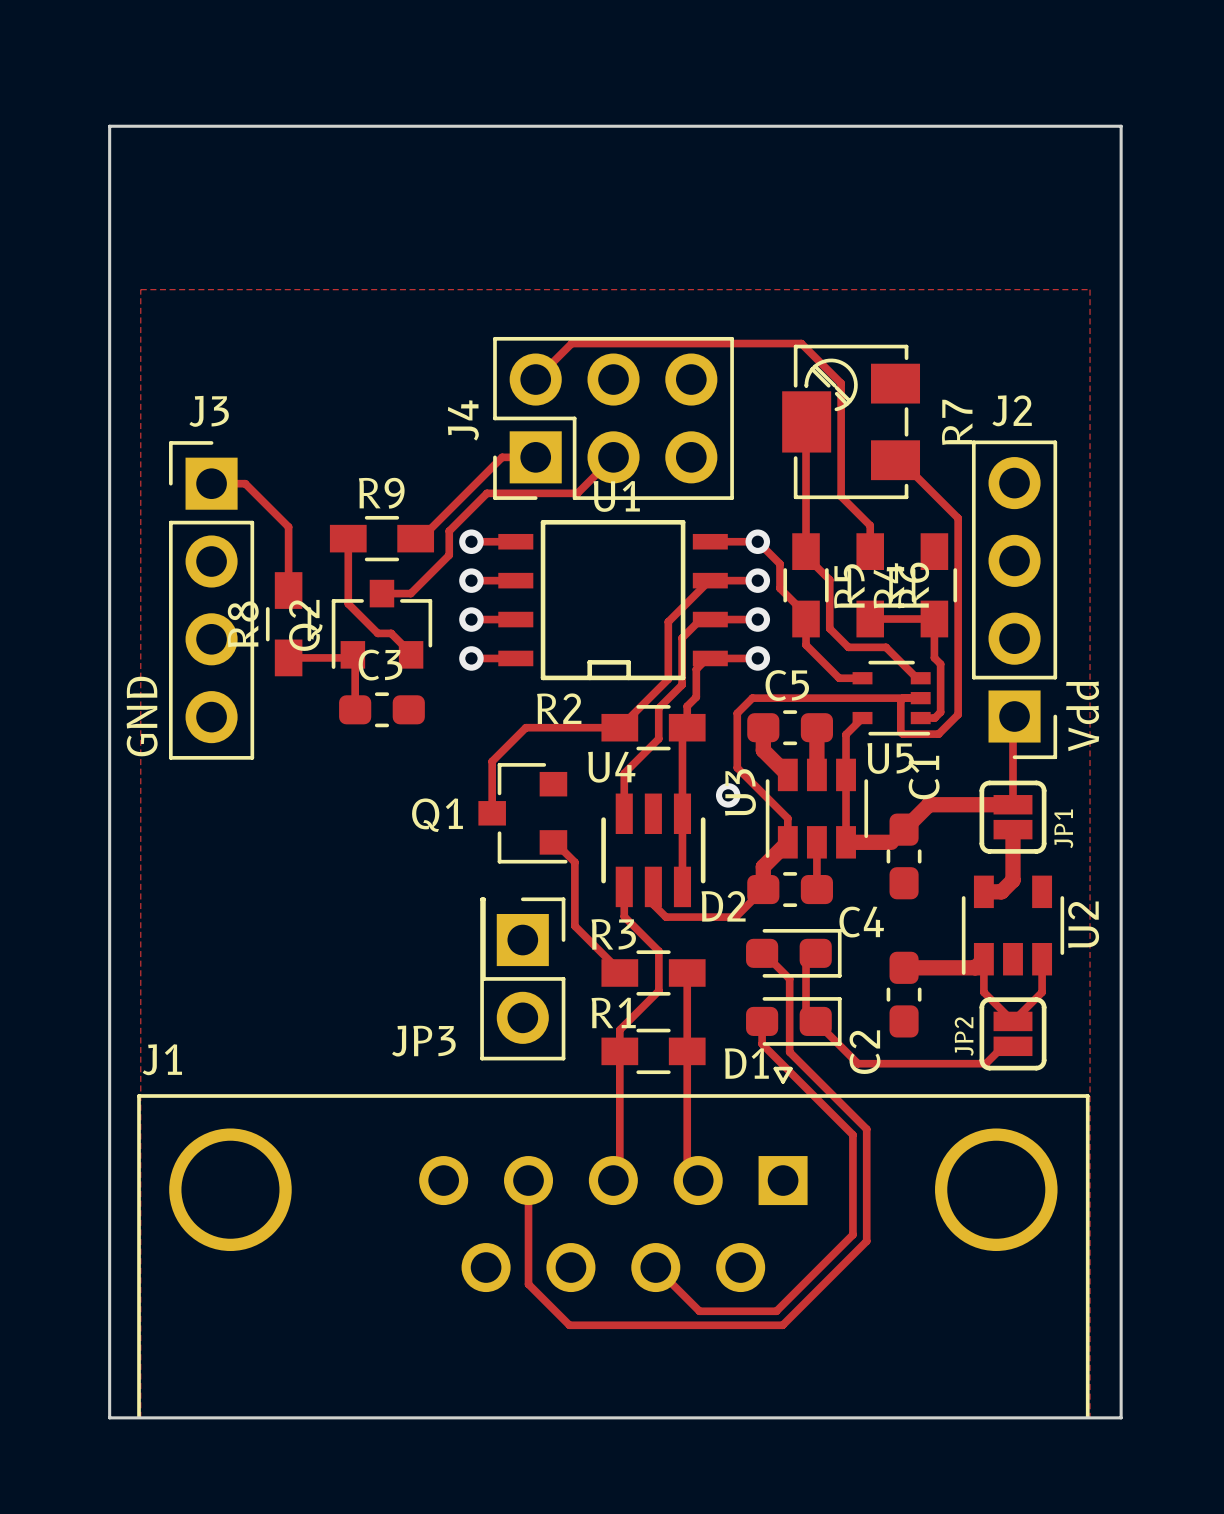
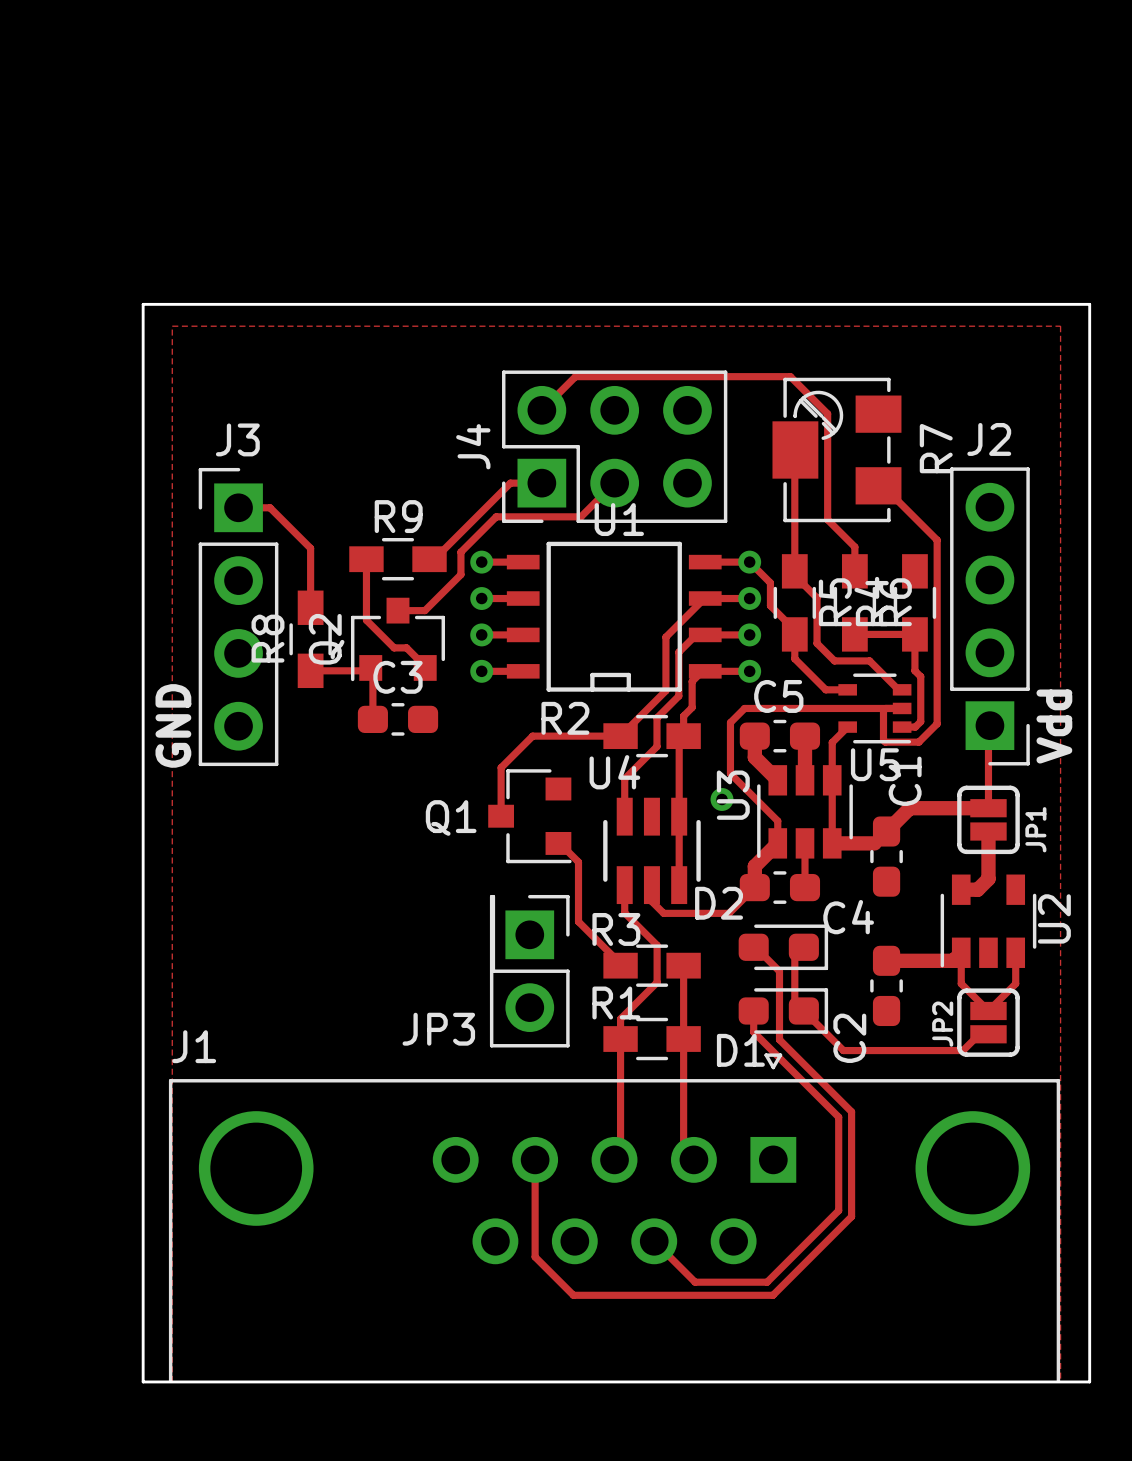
board edge: (109, 266) (109, 126) (1121, 126) (1121, 266) -> (143, 304) (1089, 304)

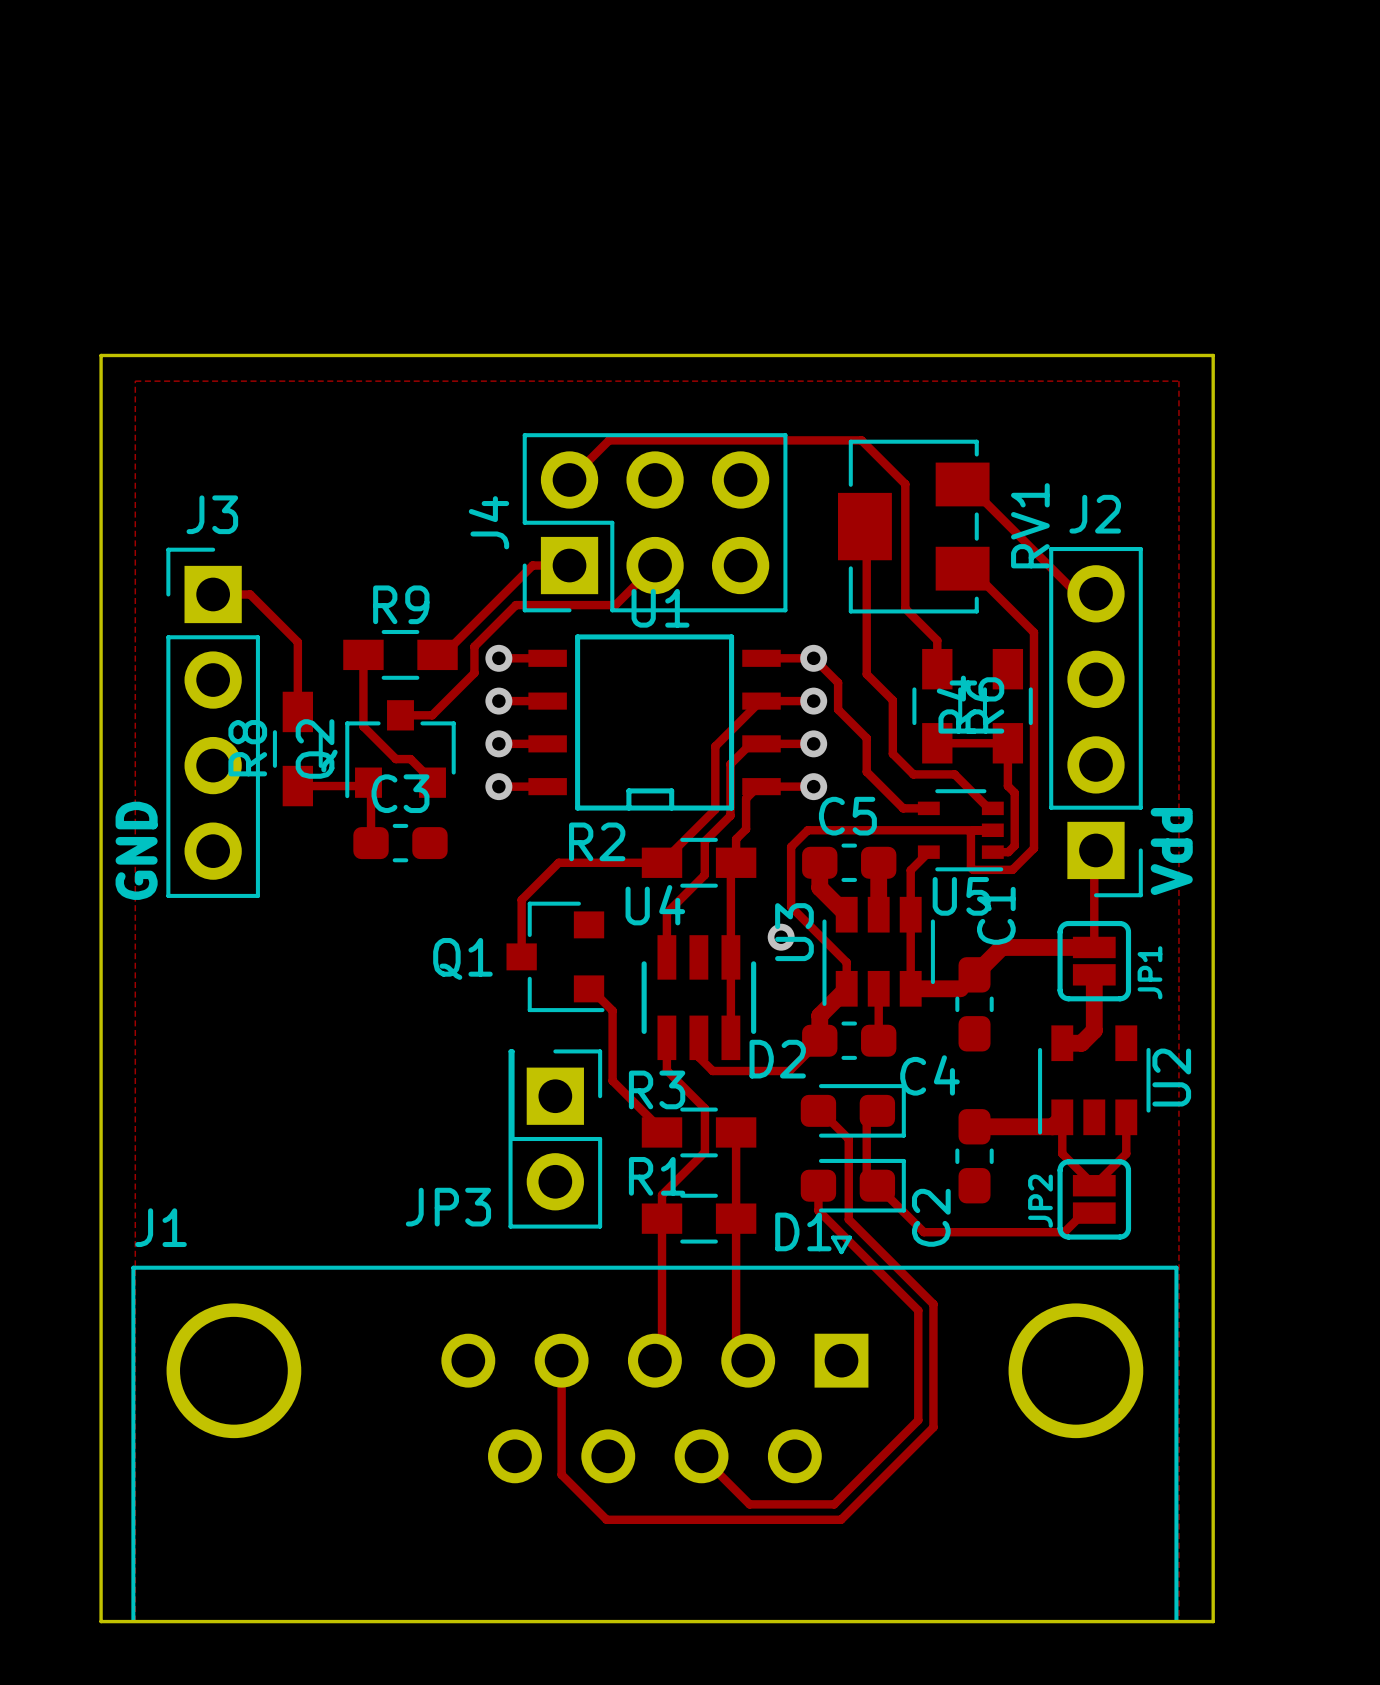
track: none -> (962, 484) (967, 484) (1077, 593) (1095, 593)
RV1: none -> (913, 526)
R7: (836, 449) -> none
R5: (794, 602) -> none

